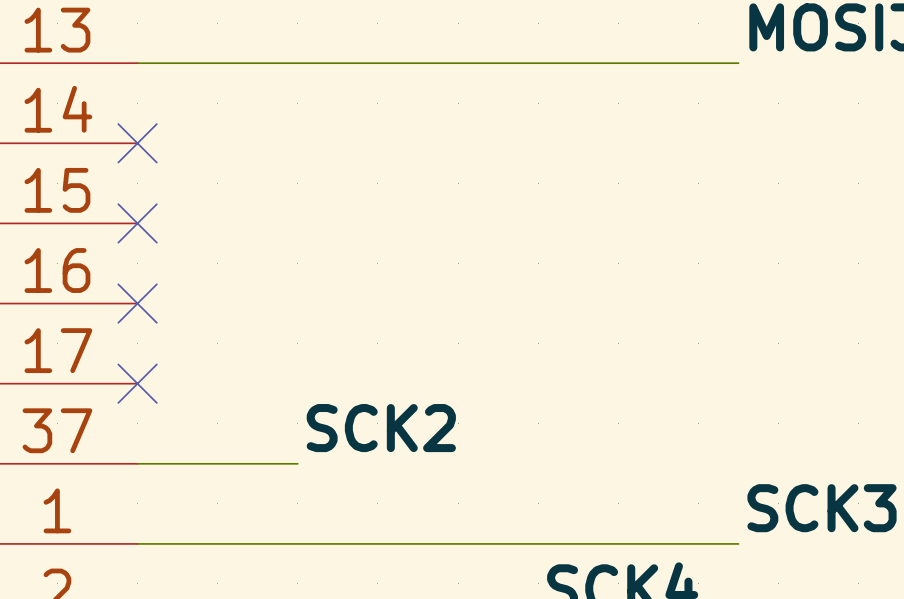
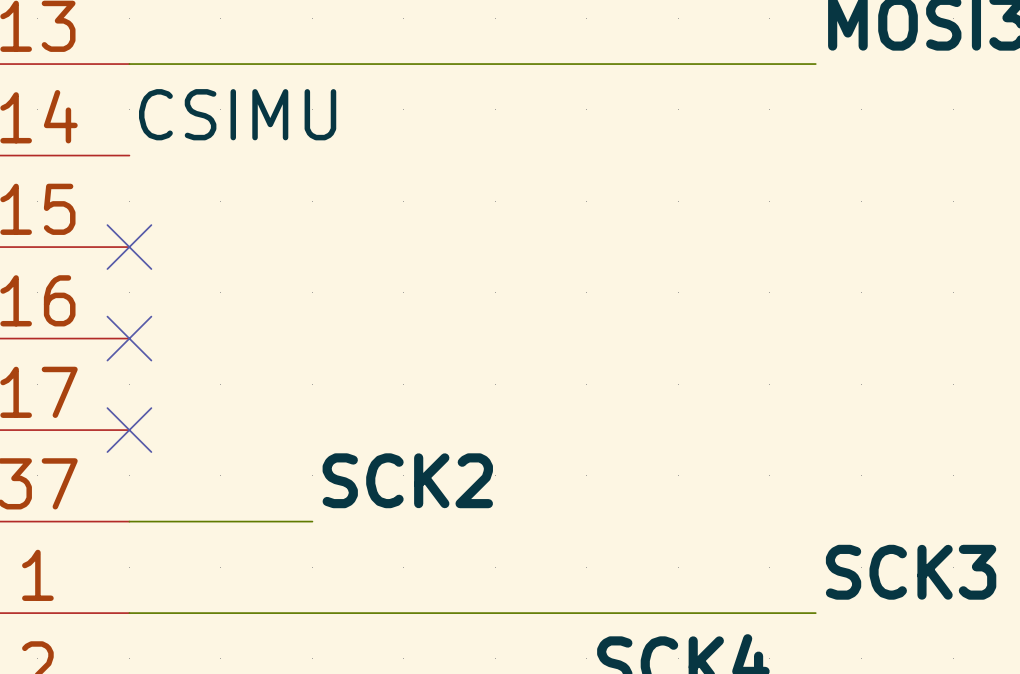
label: none -> CSIMU (237, 114)
no-connect mark: (137, 143) -> none

